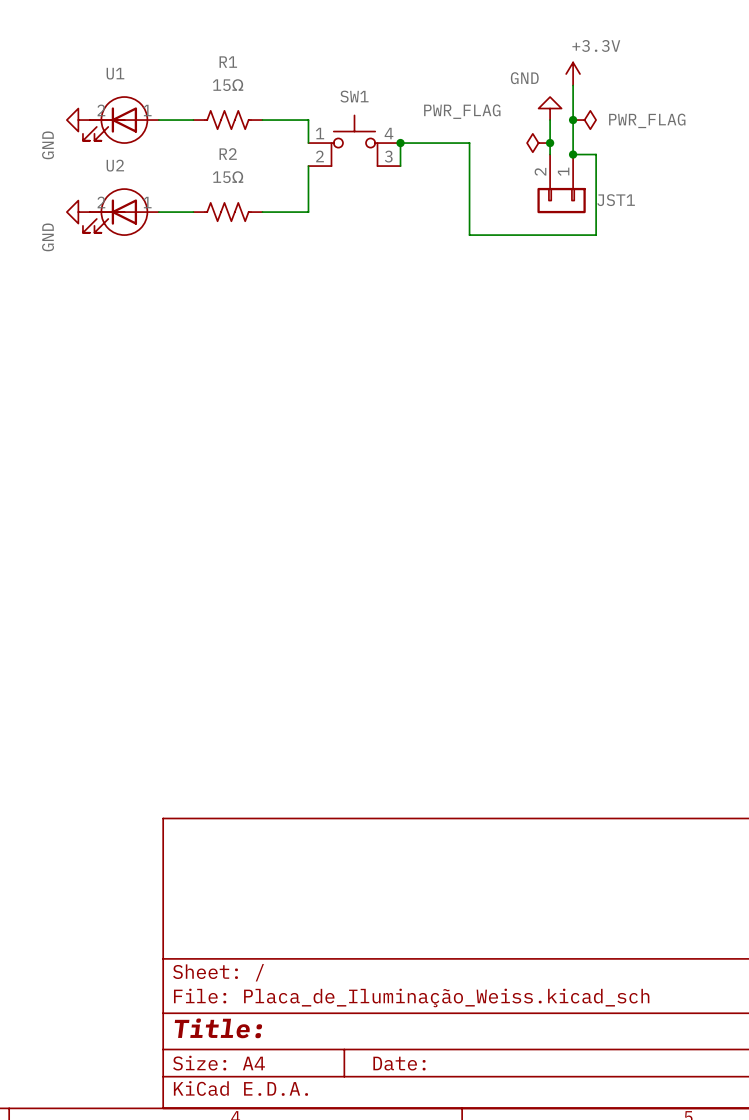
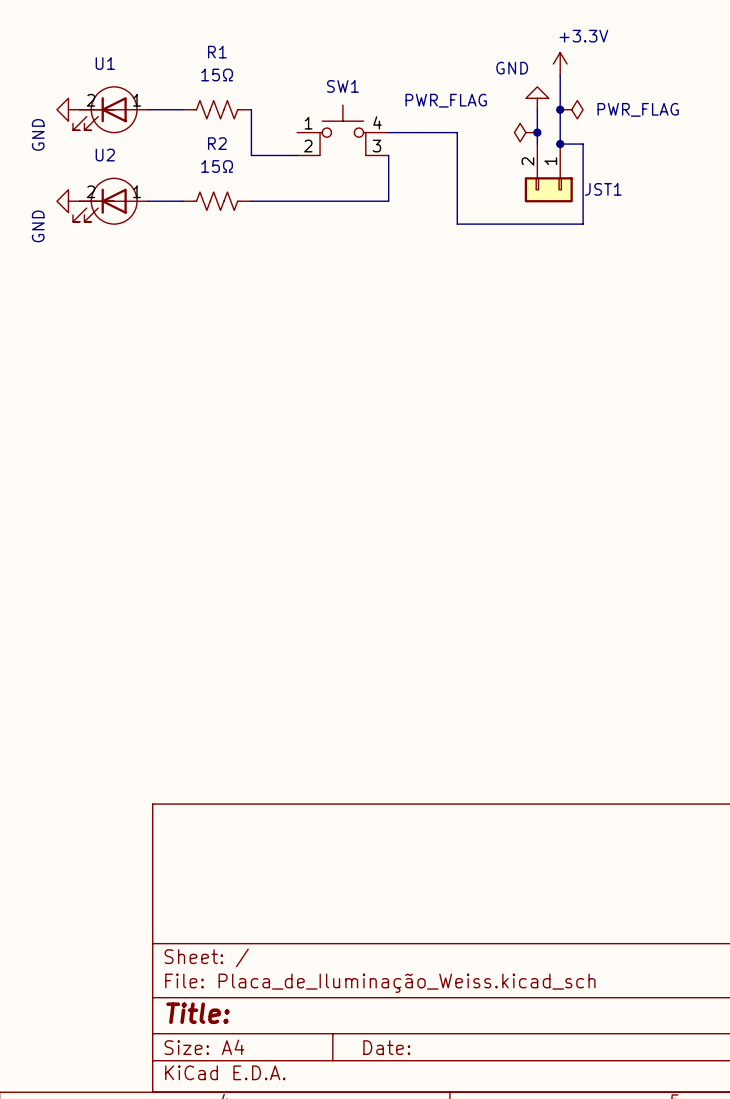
wire: (262, 120) (308, 120) (308, 143) -> (251, 109) (251, 155) (297, 155)
wire: (400, 143) (400, 166) -> none
junction: (400, 143) -> none
wire: (308, 166) (308, 212) -> (388, 155) (388, 201) (297, 201)

